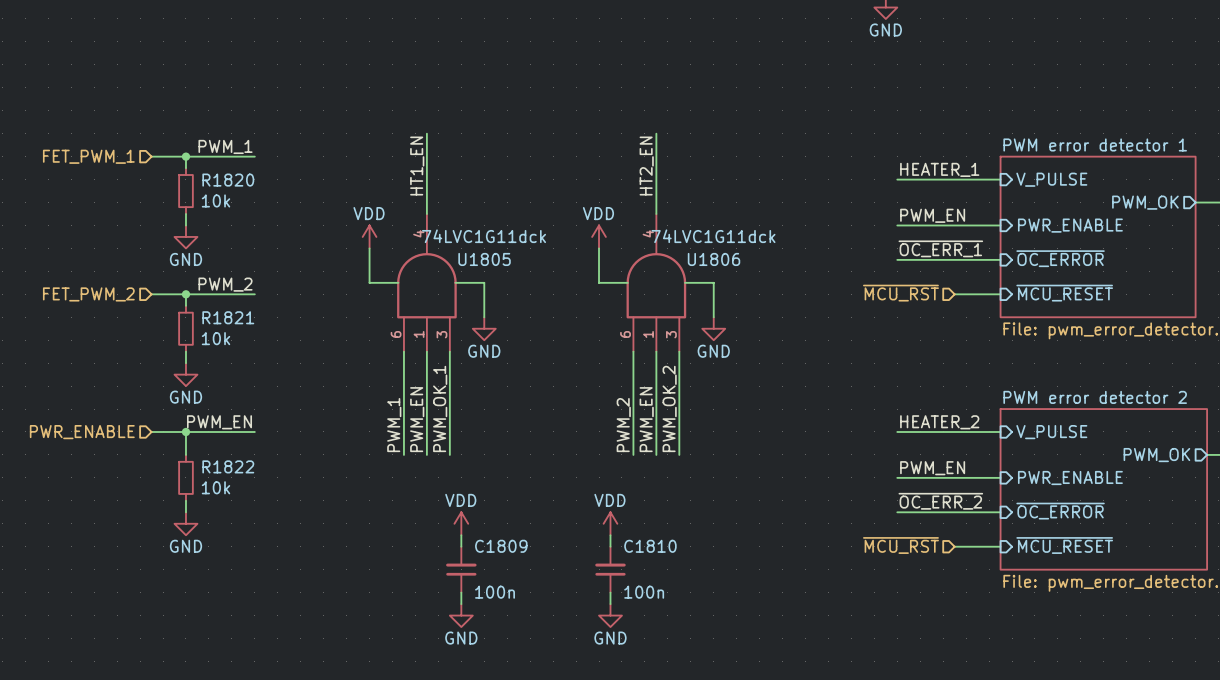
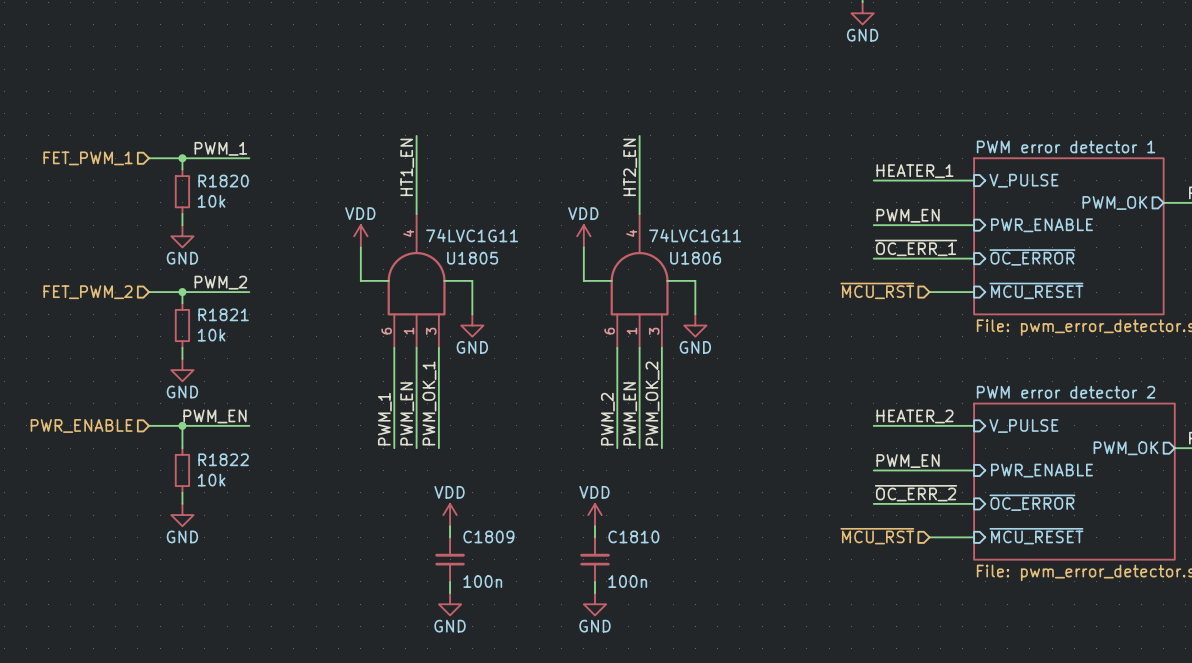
U1805 value: 74LVC1G11dck (484, 236) -> 74LVC1G11 (472, 235)
U1806 value: 74LVC1G11dck (713, 236) -> 74LVC1G11 (695, 235)

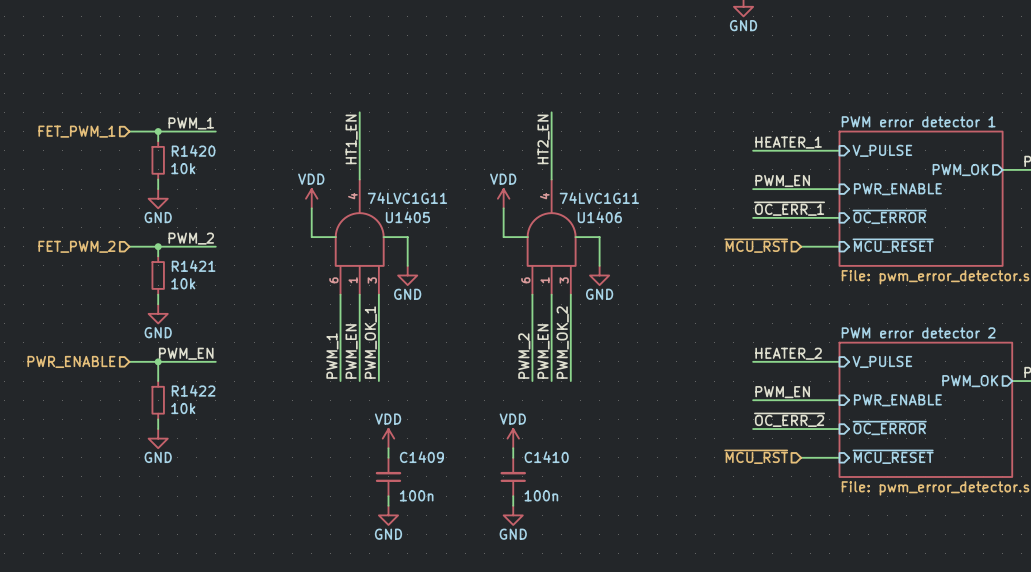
R1820 name: R1820 (223, 181) -> R1420 (193, 150)
U1805 name: U1805 (472, 258) -> U1405 (407, 217)
U1806 name: U1806 (695, 258) -> U1406 (599, 217)
R1821 name: R1821 (223, 314) -> R1421 (193, 266)
R1822 name: R1822 (223, 459) -> R1422 (193, 390)
C1809 name: C1809 (488, 536) -> C1409 (421, 457)
C1810 name: C1810 (633, 536) -> C1410 (546, 457)

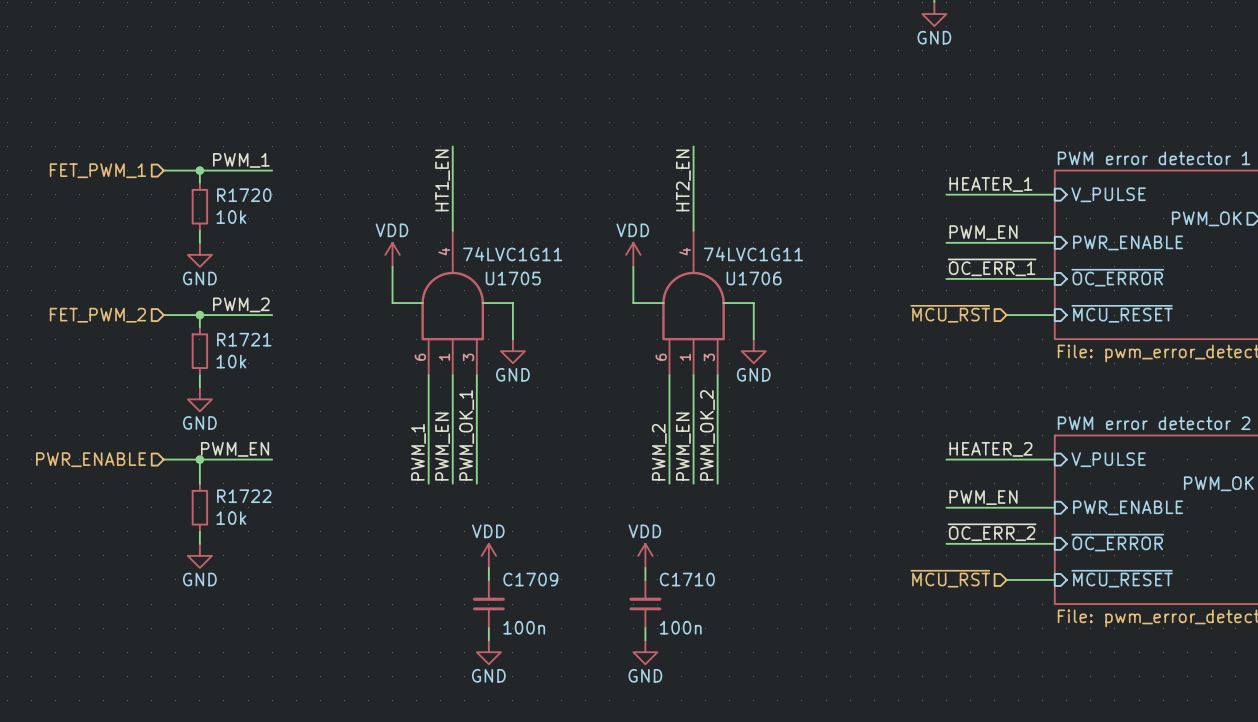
R1420 name: R1420 (193, 150) -> R1720 (244, 195)
U1405 name: U1405 (407, 217) -> U1705 (513, 278)
U1406 name: U1406 (599, 217) -> U1706 (754, 278)
R1421 name: R1421 (193, 266) -> R1721 (244, 339)
R1422 name: R1422 (193, 390) -> R1722 (244, 496)
C1409 name: C1409 (421, 457) -> C1709 (530, 579)
C1410 name: C1410 (546, 457) -> C1710 (687, 579)

